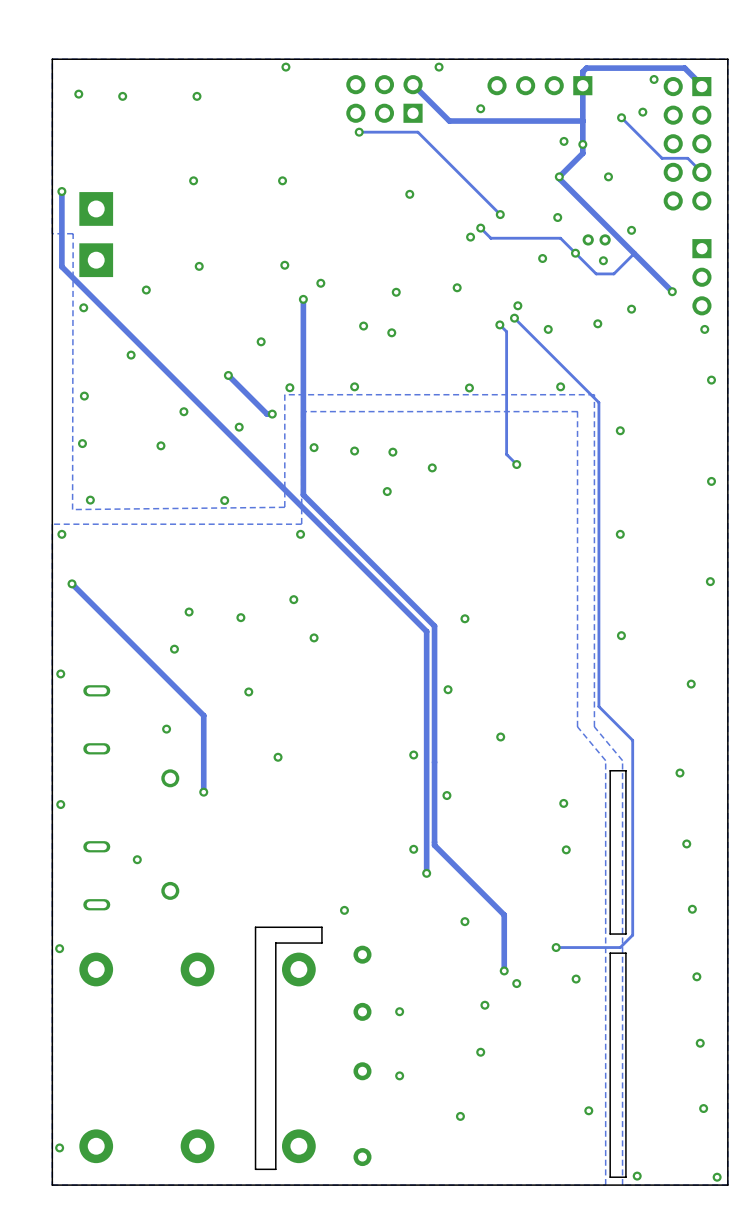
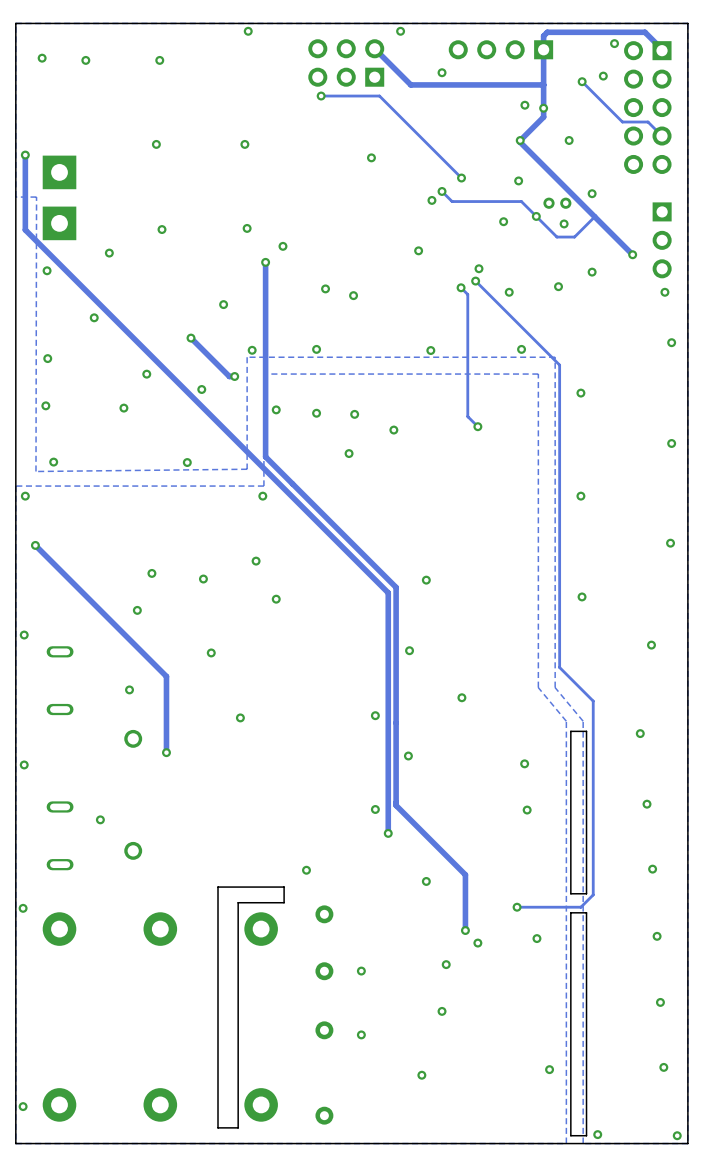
via: (396, 292) -> none

